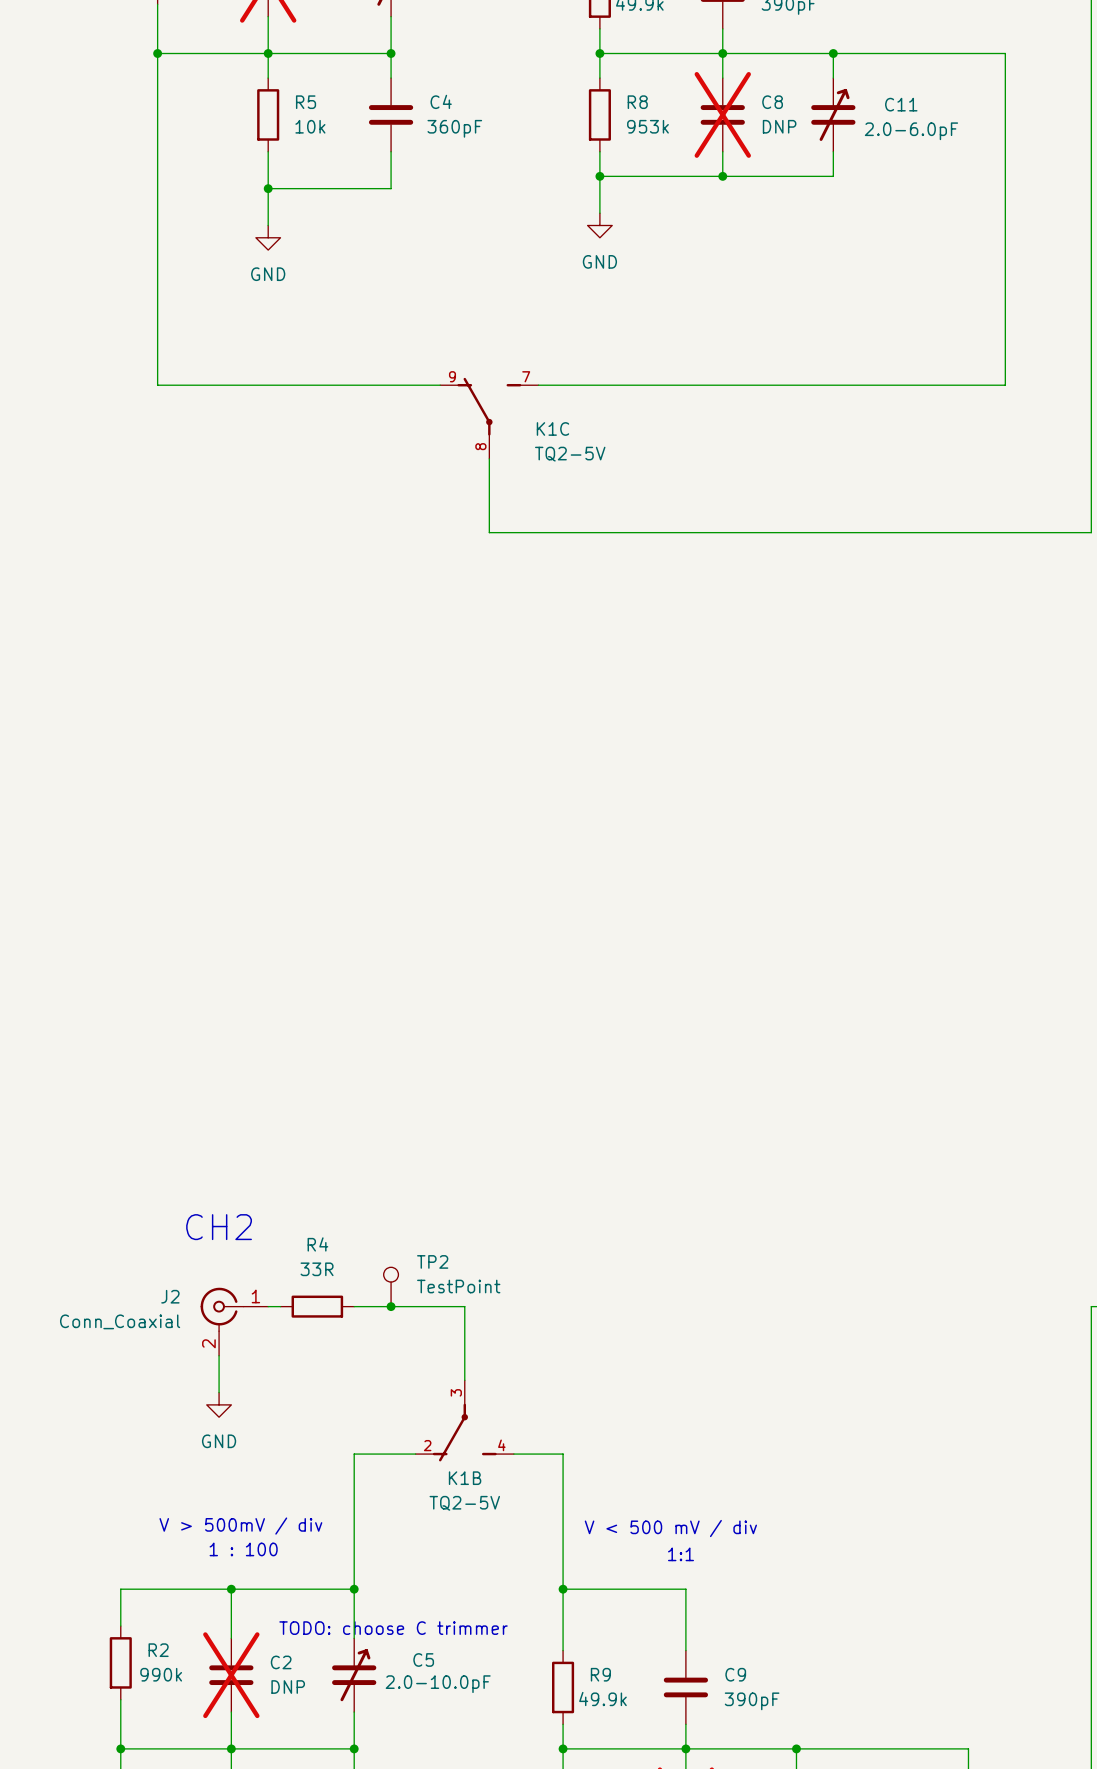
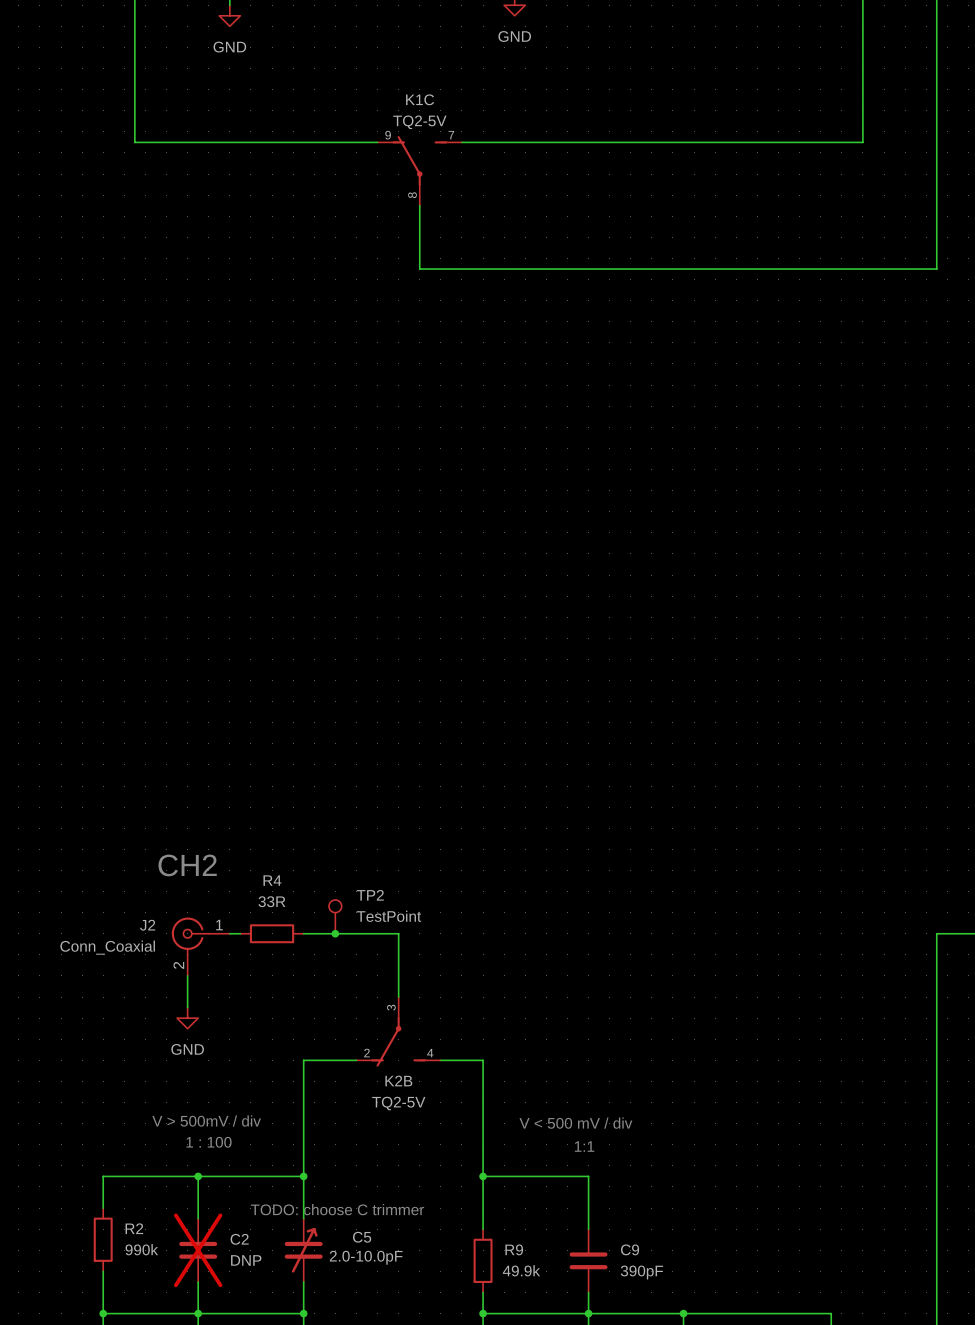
K1C name position: K1C (552, 428) -> K1C (420, 99)
K1C value position: TQ2-5V (570, 454) -> TQ2-5V (419, 122)
K1B name: K1B (465, 1478) -> K2B (398, 1081)

